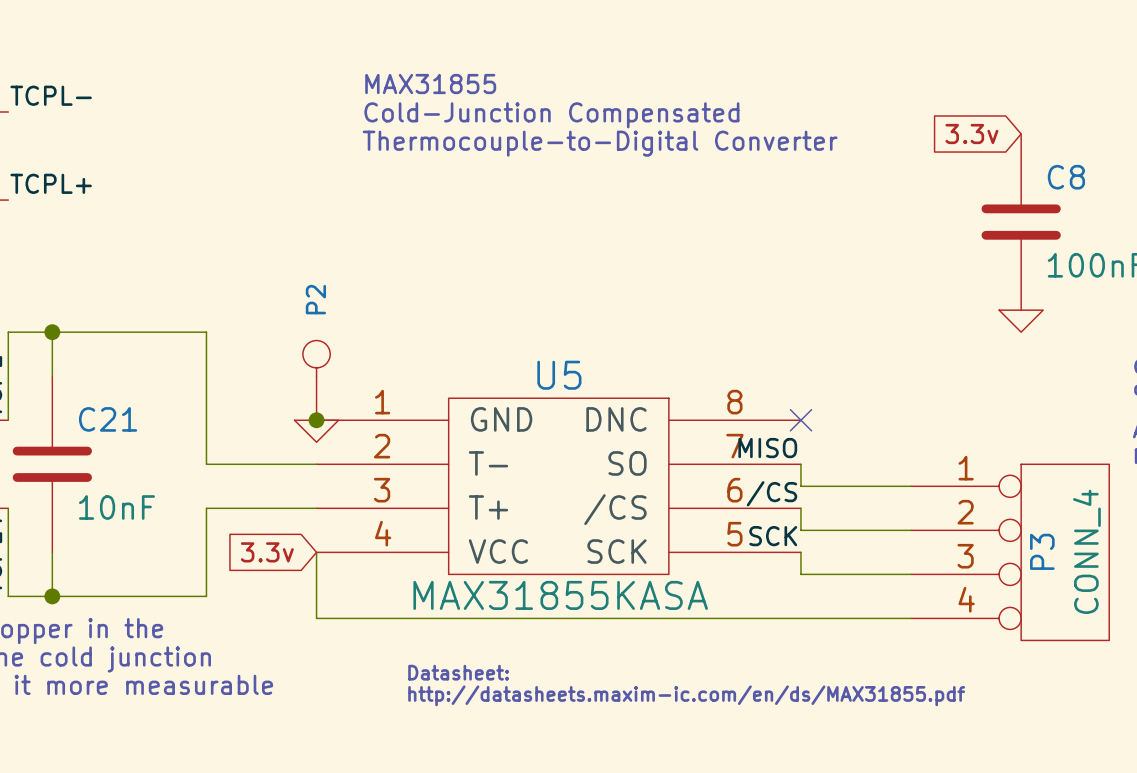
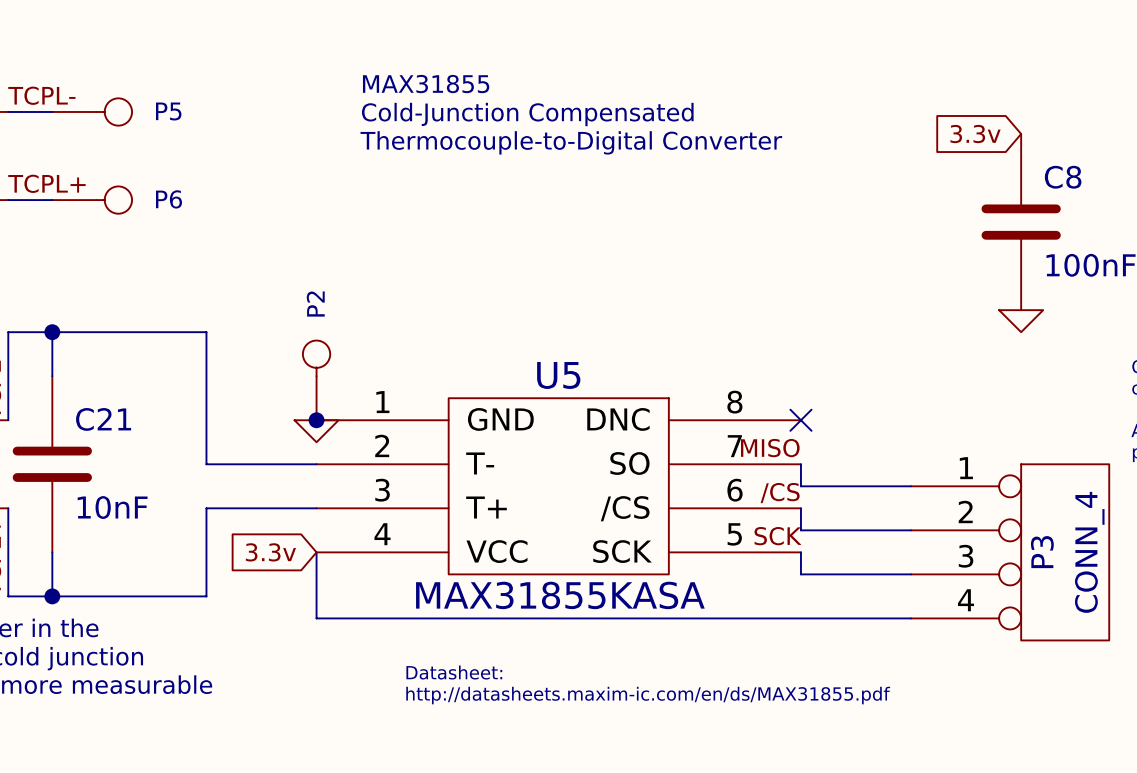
wire: none -> (8, 111) (52, 111)
P5: none -> (92, 111)
wire: none -> (8, 200) (52, 200)
P6: none -> (92, 200)

